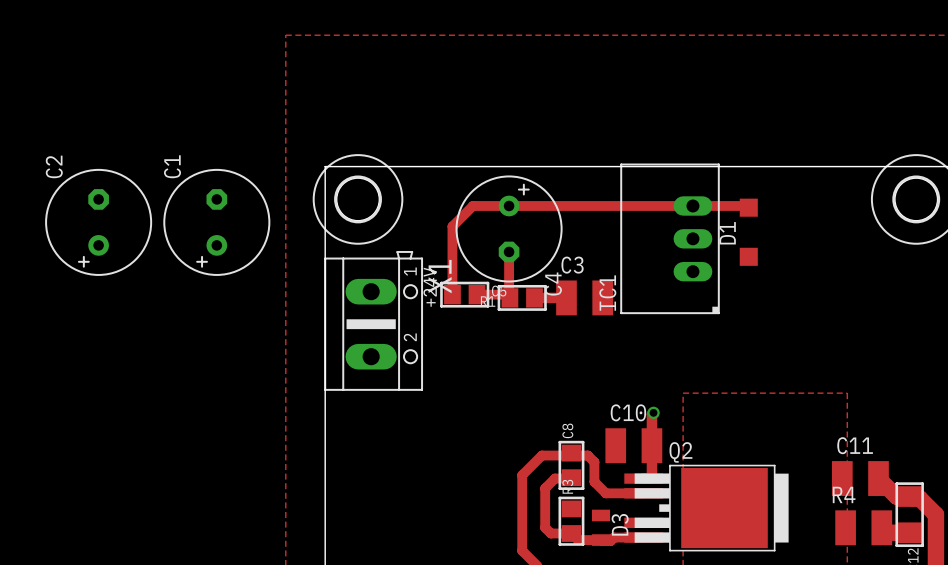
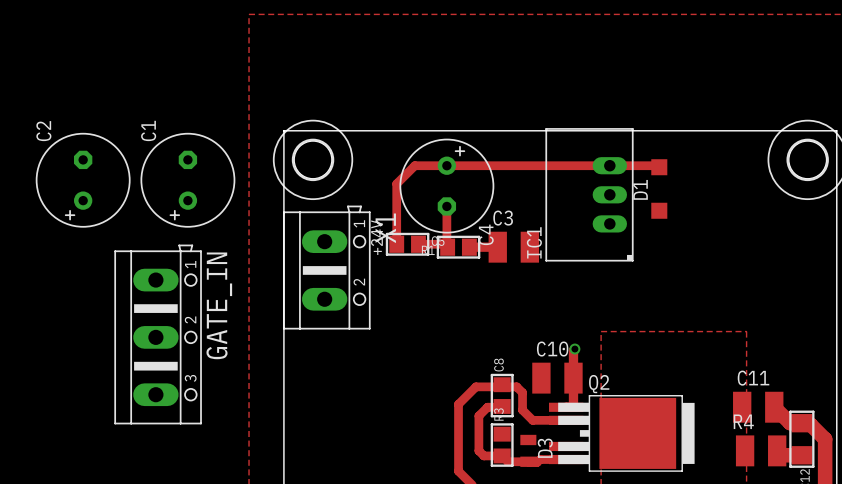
GATE_IN: none -> (158, 334)

